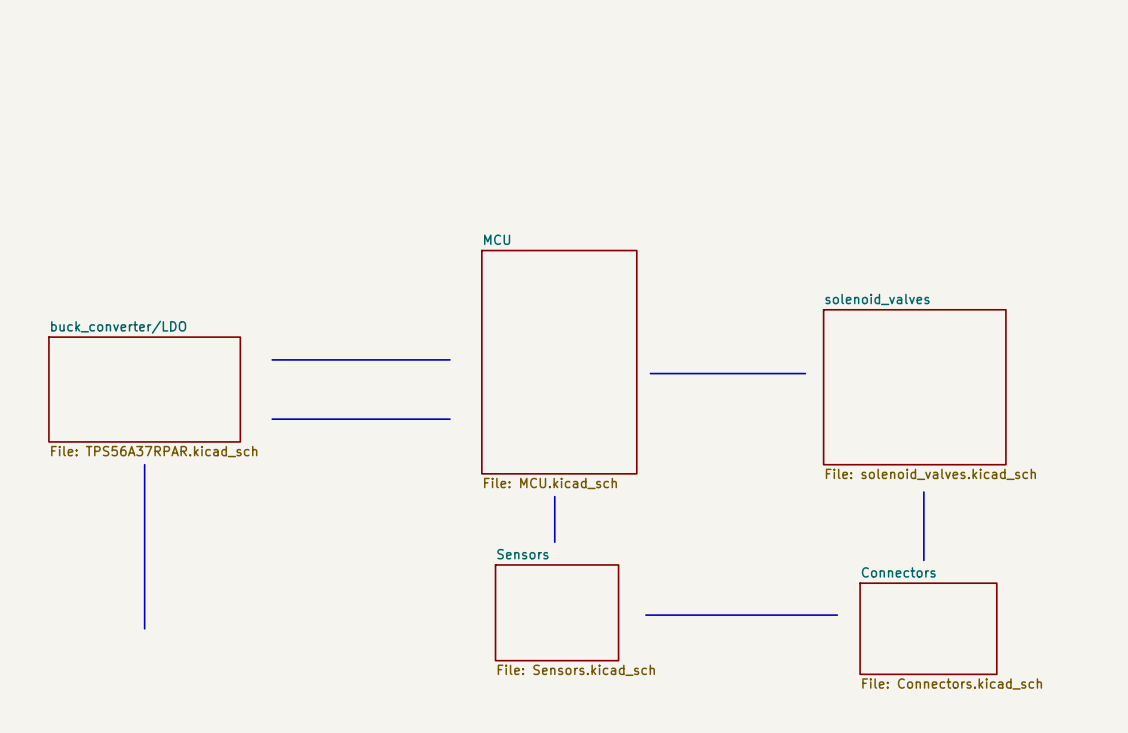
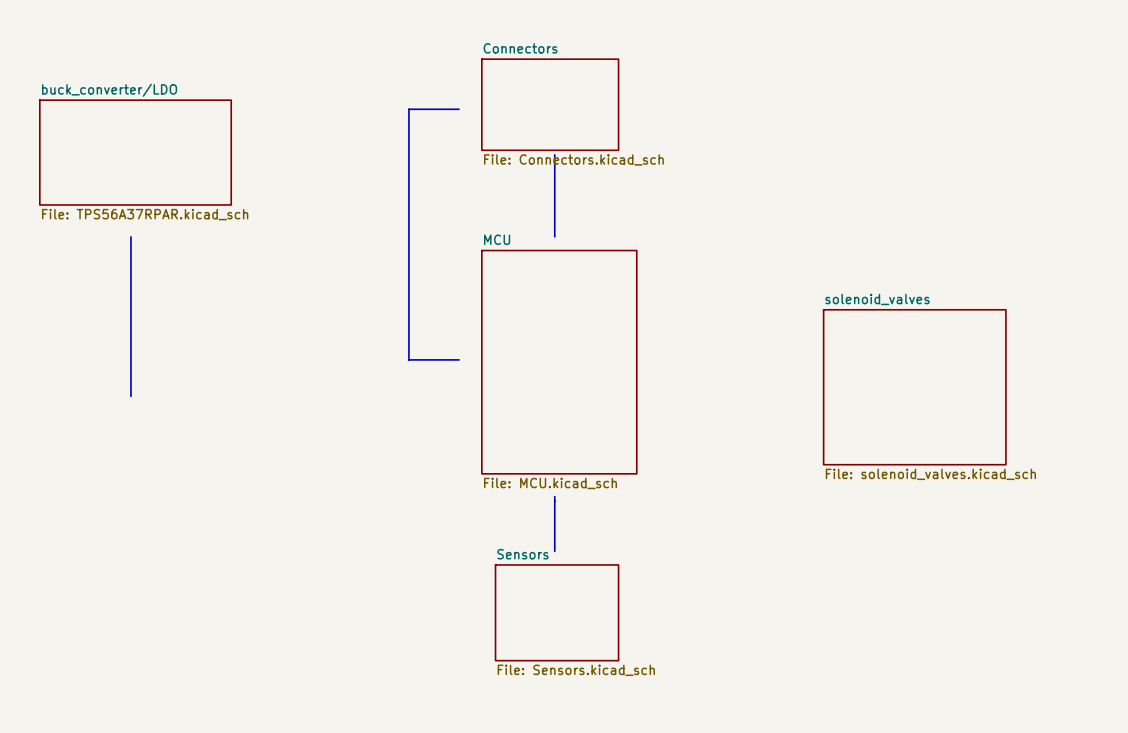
sheet Connectors: none -> File: Connectors.kicad_sch (550, 104)
sheet buck_converter/LDO: none -> File: TPS56A37RPAR.kicad_sch (135, 152)
line: none -> (554, 154) (554, 236)
line: none -> (130, 236) (130, 396)
line: (272, 359) (408, 359) -> (459, 109) (408, 109) (408, 359)
line: none -> (449, 359) (459, 359)
line: (650, 373) (805, 373) -> none
sheet buck_converter/LDO: File: TPS56A37RPAR.kicad_sch (144, 389) -> none
line: (272, 419) (449, 419) -> none
line: (144, 464) (144, 628) -> none
line: (923, 492) (923, 560) -> none
line: none -> (554, 542) (554, 551)
line: (645, 615) (837, 615) -> none
sheet Connectors: File: Connectors.kicad_sch (928, 628) -> none

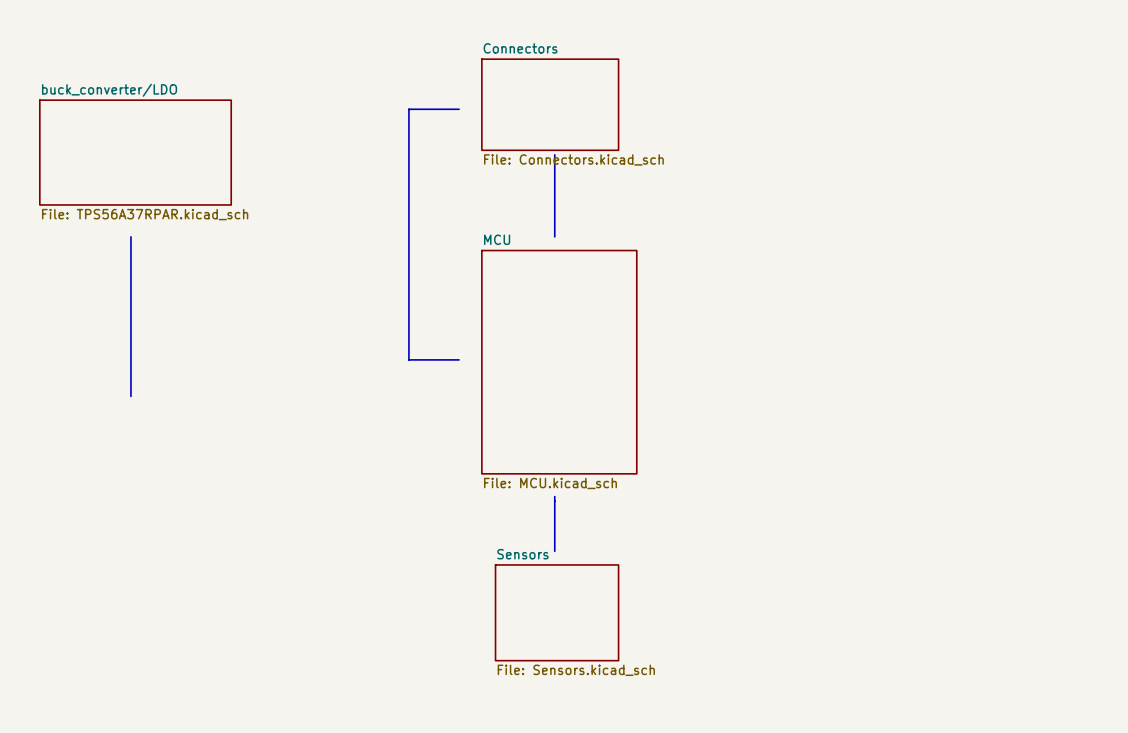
sheet solenoid_valves: File: solenoid_valves.kicad_sch (914, 387) -> none

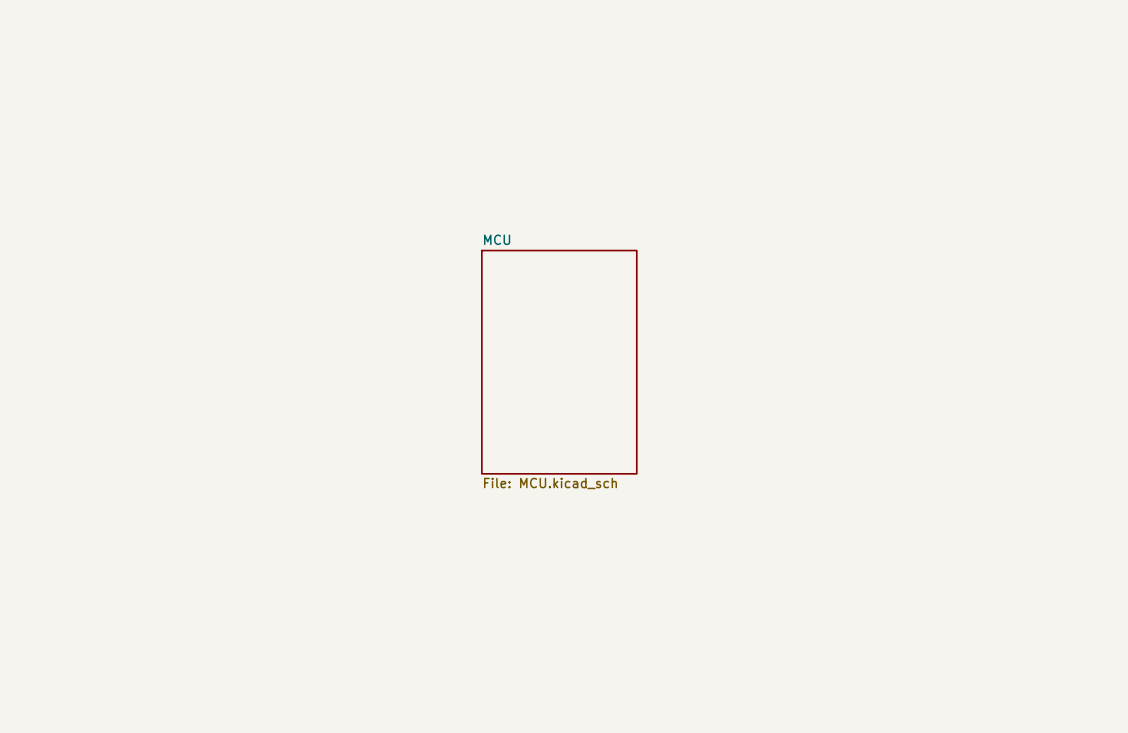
sheet Connectors: File: Connectors.kicad_sch (550, 104) -> none
line: (459, 109) (408, 109) (408, 359) (459, 359) -> none
sheet buck_converter/LDO: File: TPS56A37RPAR.kicad_sch (135, 152) -> none
line: (554, 154) (554, 236) -> none
line: (130, 236) (130, 396) -> none
line: (554, 496) (554, 551) -> none
sheet Sensors: File: Sensors.kicad_sch (557, 612) -> none

